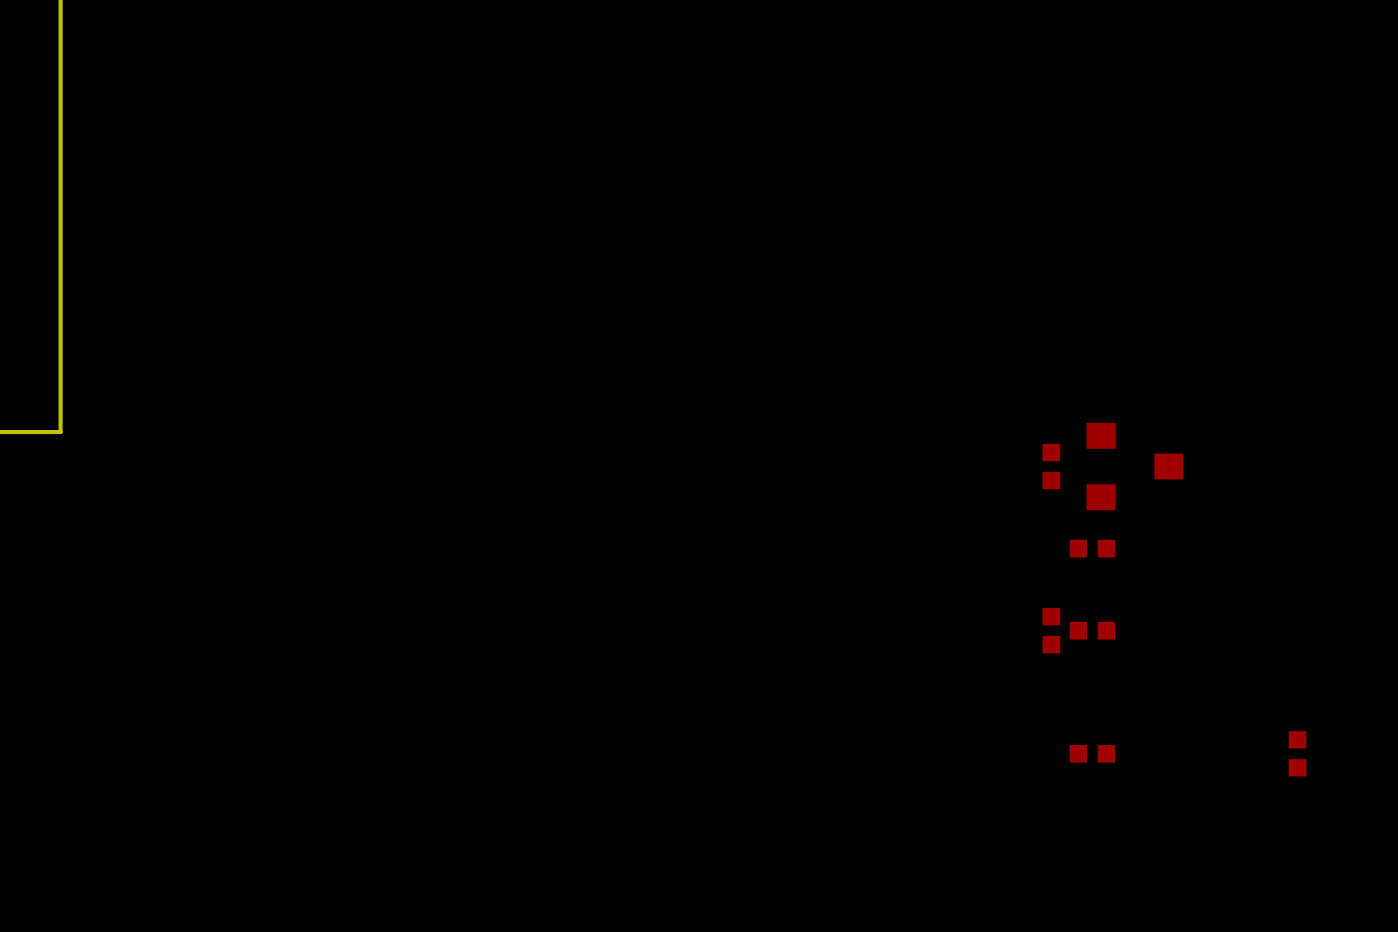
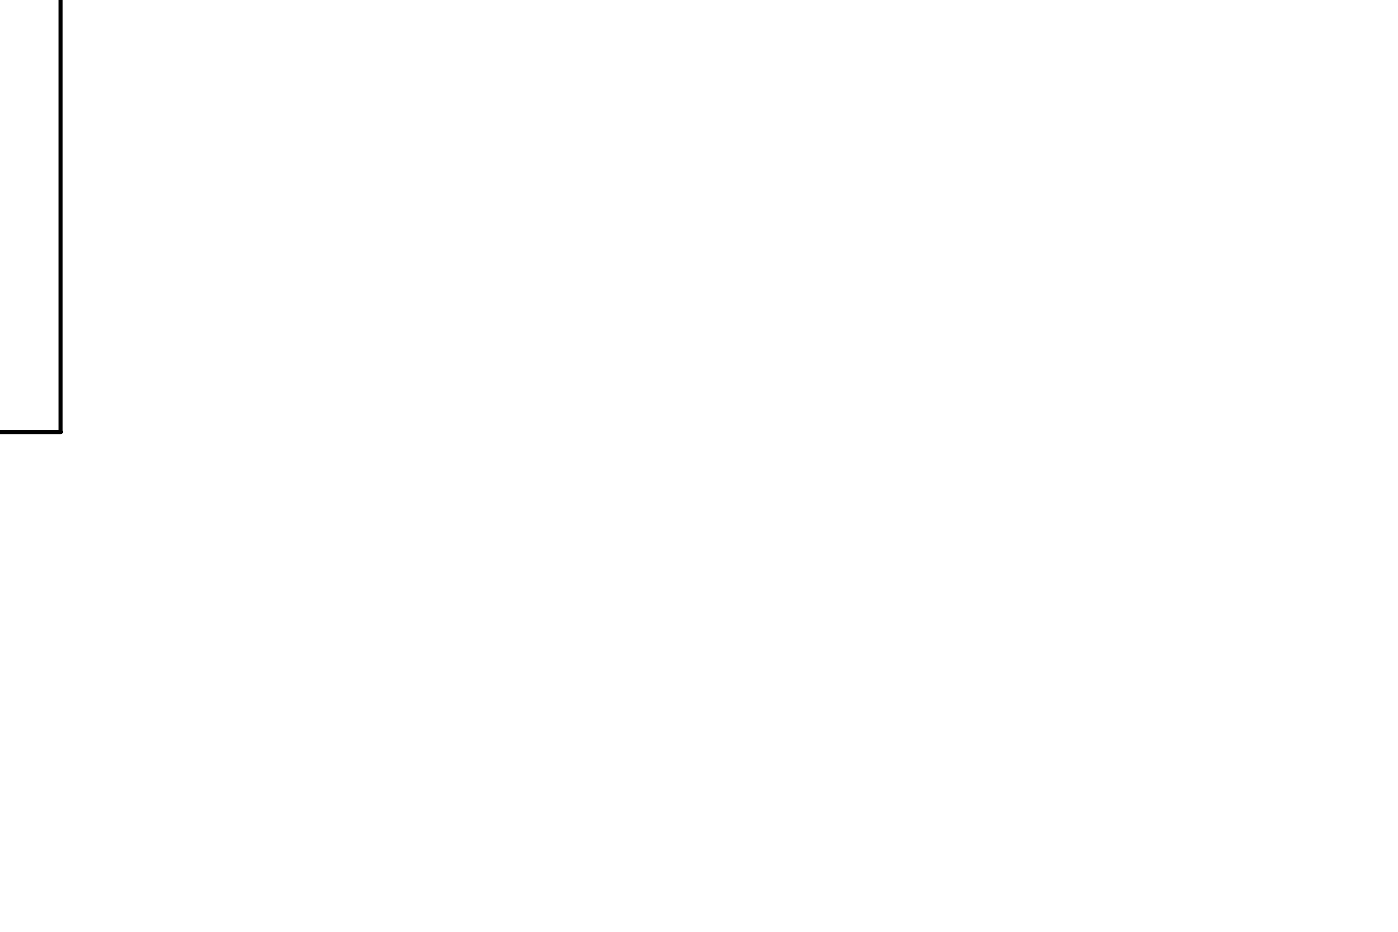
part: (1051, 466) -> none
part: (1135, 466) -> none
part: (1092, 548) -> none
part: (1051, 630) -> none
part: (1092, 630) -> none
part: (1092, 753) -> none
part: (1297, 753) -> none

